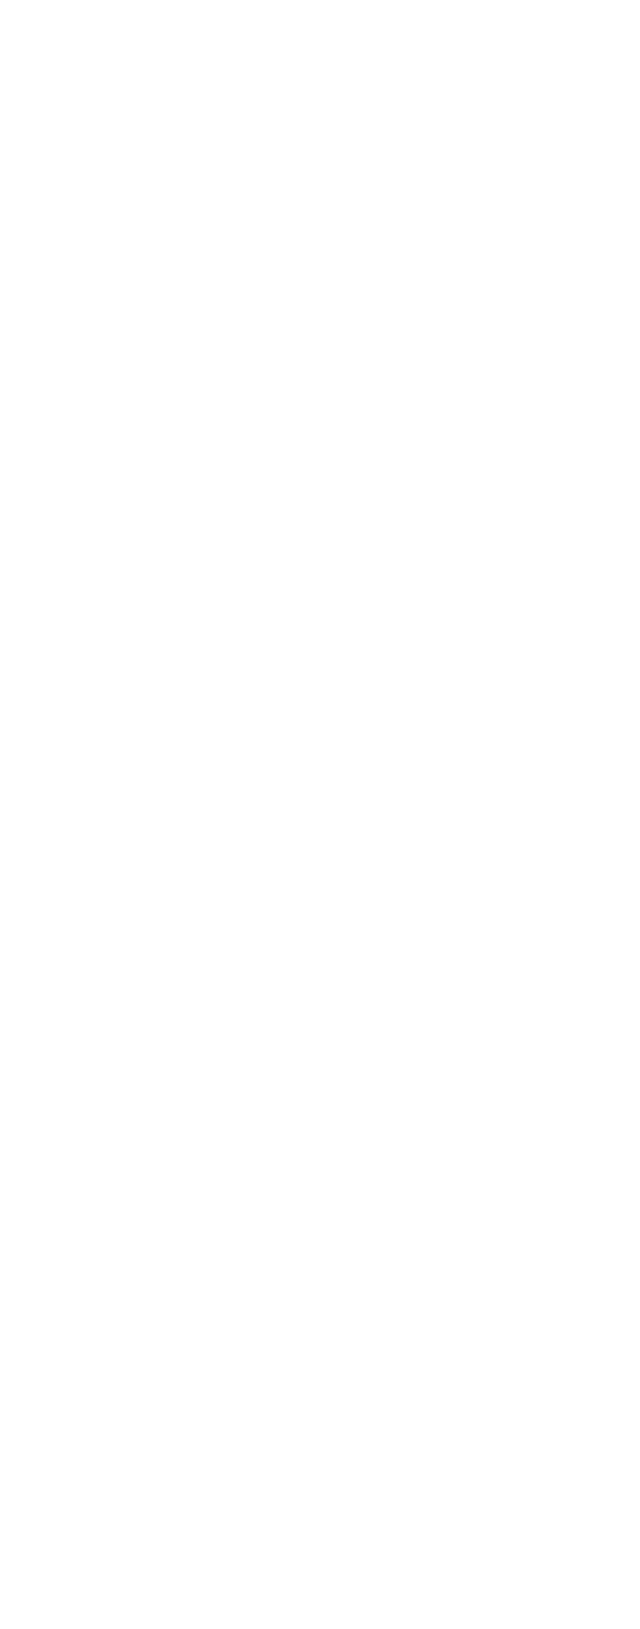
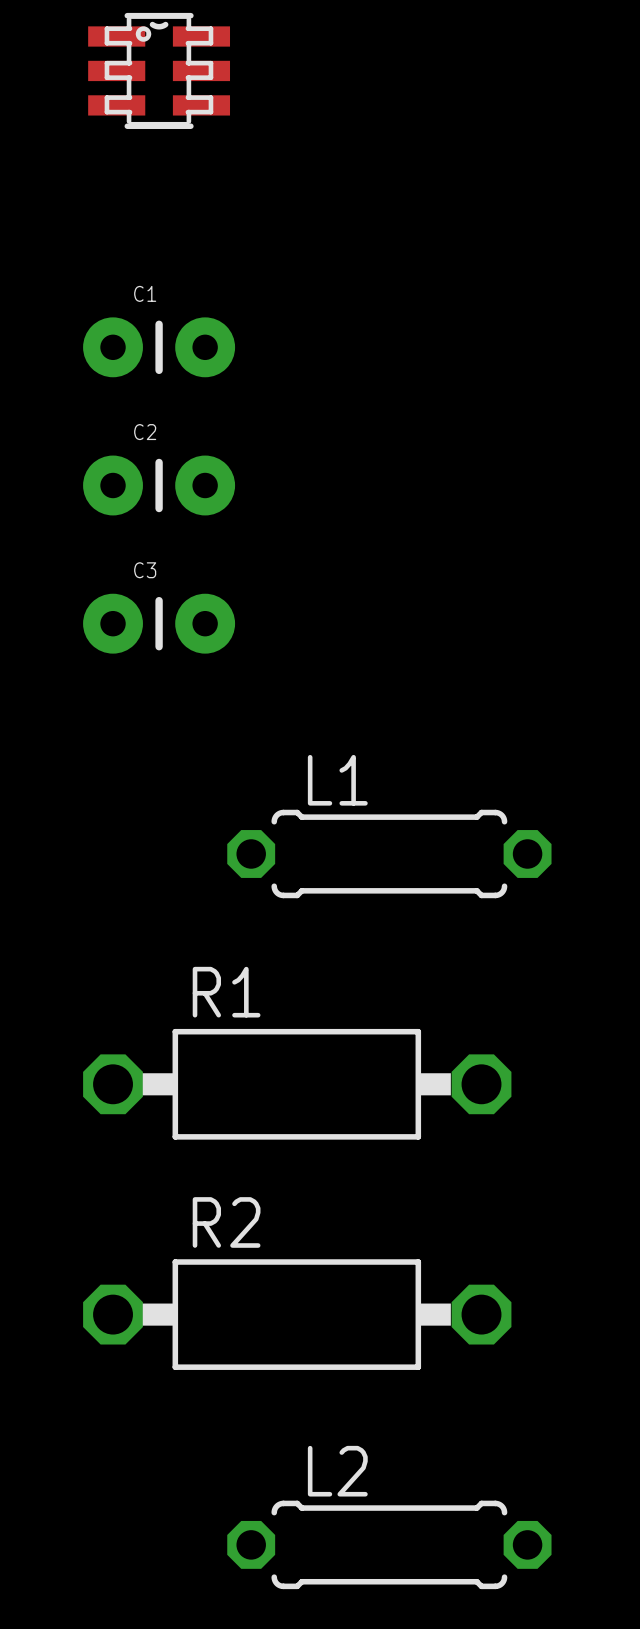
part: none -> (159, 70)
C1: none -> (159, 347)
C2: none -> (159, 485)
C3: none -> (159, 623)
L1: none -> (389, 853)
R1: none -> (297, 1084)
R2: none -> (297, 1314)
L2: none -> (389, 1544)

